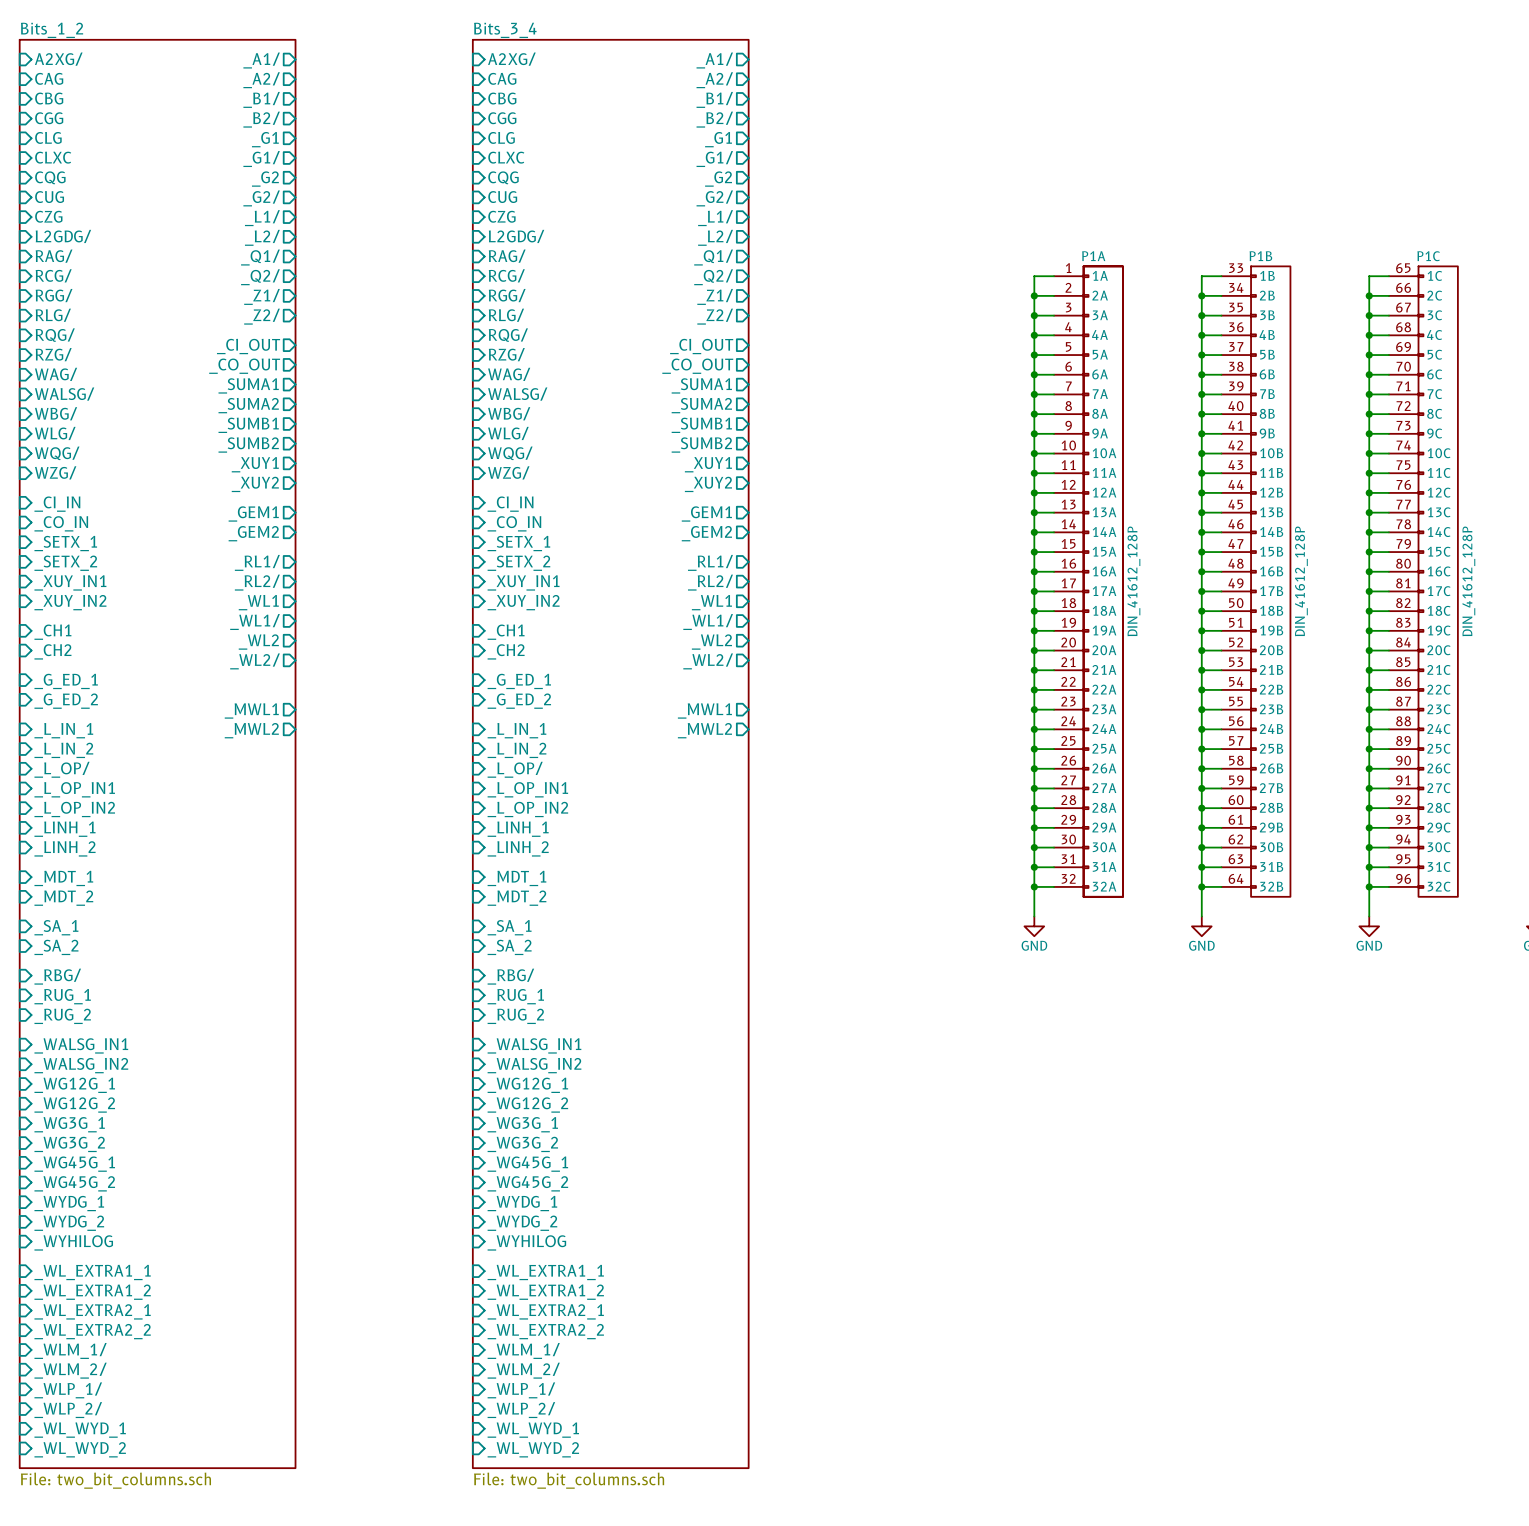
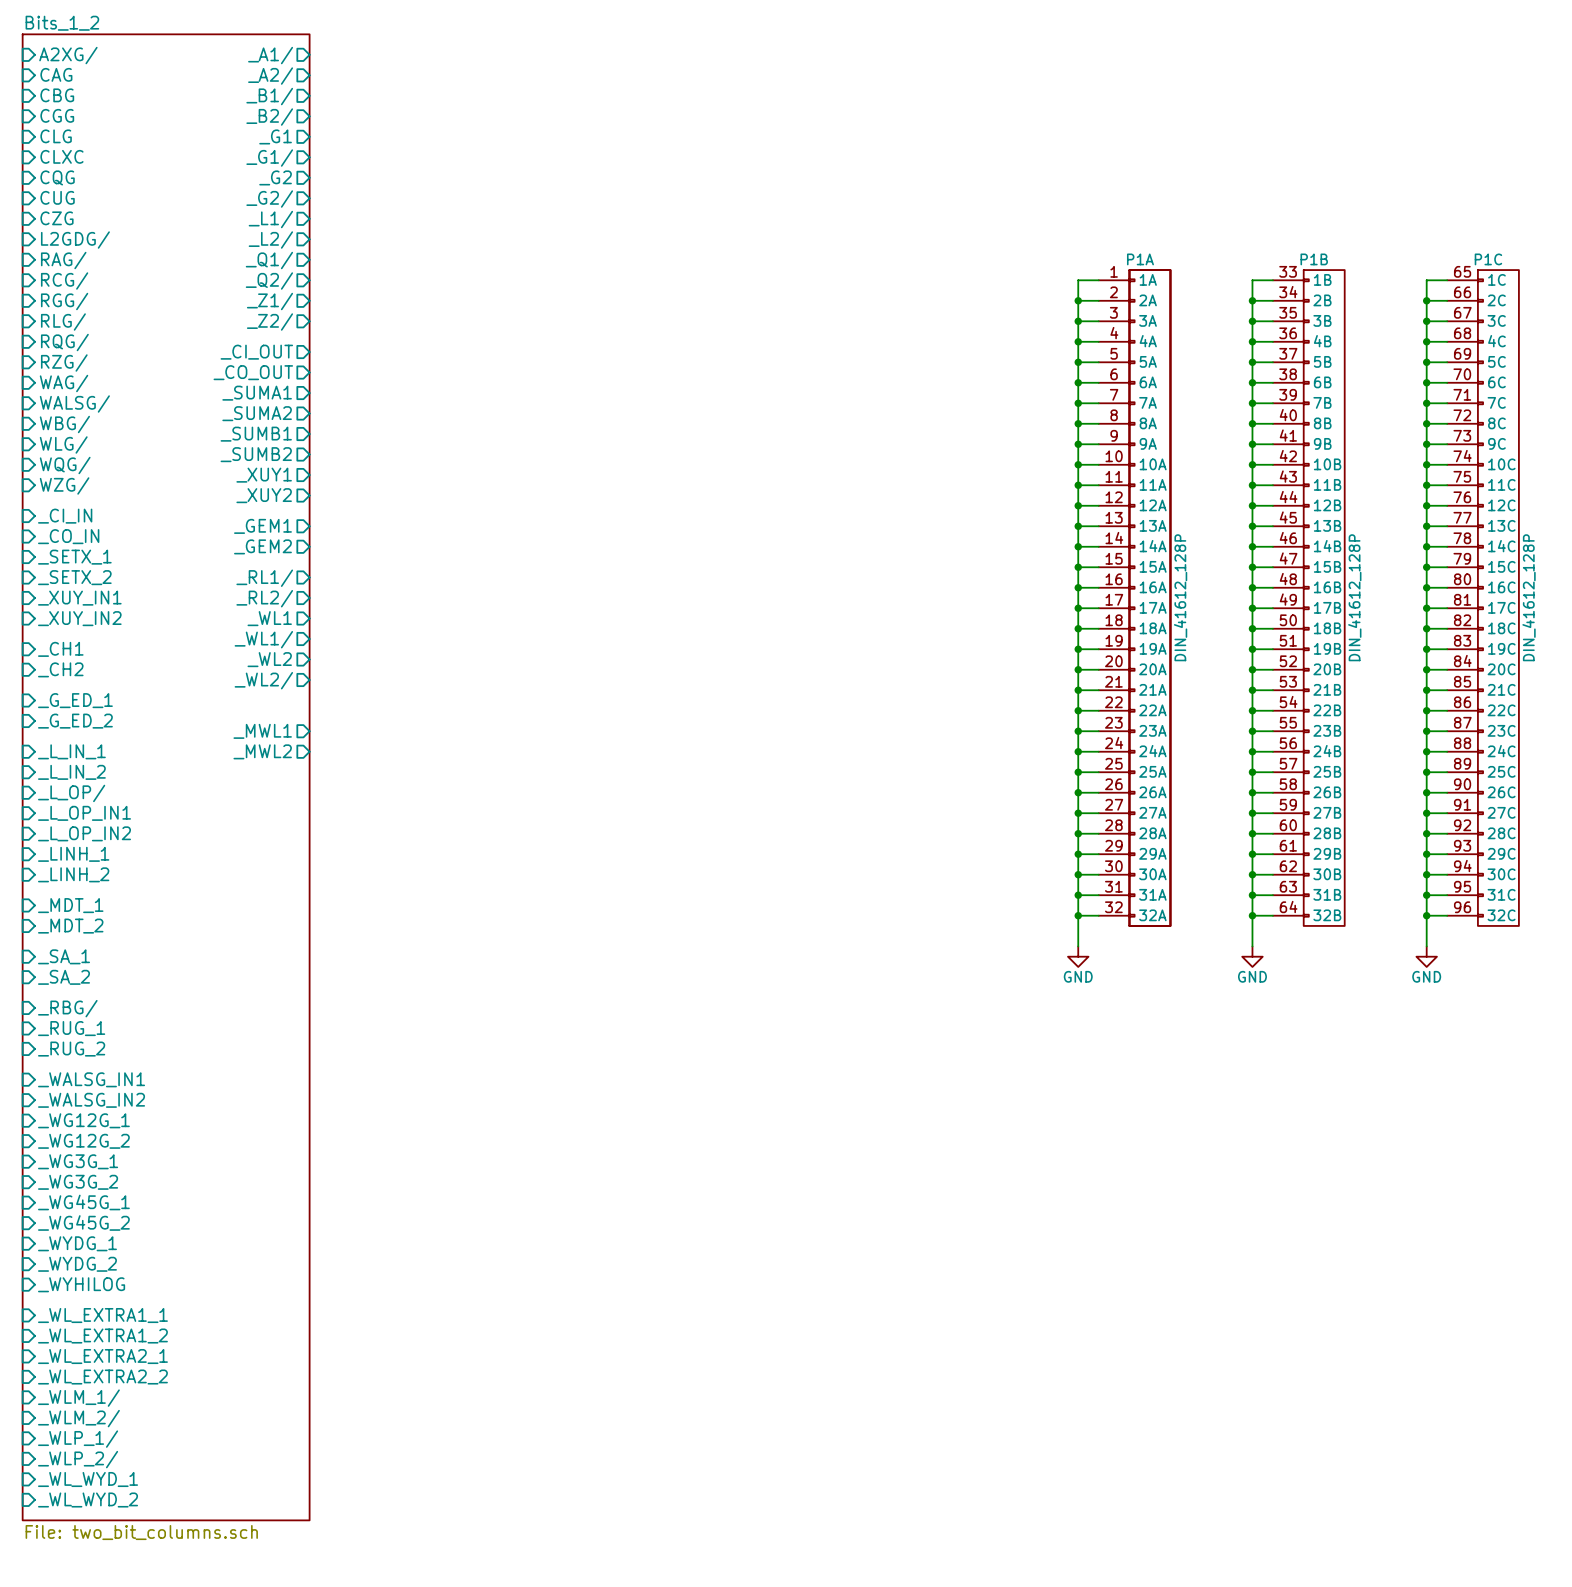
sheet pin: A2XG/ (511, 59) -> none
sheet pin: _A1/ (714, 60) -> none
sheet pin: CAG (502, 78) -> none
sheet pin: _A2/ (714, 80) -> none
sheet pin: CBG (502, 98) -> none
sheet pin: _B1/ (714, 99) -> none
sheet pin: CGG (502, 118) -> none
sheet pin: _B2/ (714, 119) -> none
sheet pin: CLG (501, 137) -> none
sheet pin: _G1 (718, 139) -> none
sheet pin: CLXC (506, 157) -> none
sheet pin: _G1/ (714, 159) -> none
sheet pin: CQG (503, 177) -> none
sheet pin: _G2 (718, 179) -> none
sheet pin: CUG (502, 197) -> none
sheet pin: _G2/ (714, 198) -> none
sheet pin: CZG (501, 216) -> none
sheet pin: _L1/ (715, 218) -> none
sheet pin: L2GDG/ (516, 236) -> none
sheet pin: _L2/ (715, 237) -> none
sheet pin: RAG/ (507, 256) -> none
sheet pin: _Q1/ (713, 257) -> none
sheet pin: RCG/ (506, 275) -> none
sheet pin: _Q2/ (713, 277) -> none
sheet pin: RGG/ (507, 295) -> none
sheet pin: _Z1/ (715, 296) -> none
sheet pin: RLG/ (506, 315) -> none
sheet pin: _Z2/ (715, 316) -> none
sheet pin: RQG/ (508, 335) -> none
sheet pin: _CI_OUT (701, 346) -> none
sheet pin: RZG/ (506, 354) -> none
sheet pin: _CO_OUT (697, 366) -> none
sheet pin: WAG/ (509, 374) -> none
sheet pin: _SUMA1 (701, 385) -> none
sheet pin: WALSG/ (517, 394) -> none
sheet pin: _SUMA2 (701, 405) -> none
sheet pin: WBG/ (509, 413) -> none
sheet pin: _SUMB1 (701, 425) -> none
sheet pin: WLG/ (508, 433) -> none
sheet pin: _SUMB2 (701, 445) -> none
sheet pin: WQG/ (510, 453) -> none
sheet pin: _XUY1 (708, 464) -> none
sheet pin: WZG/ (508, 472) -> none
sheet pin: _XUY2 (708, 484) -> none
sheet pin: _CI_IN (510, 504) -> none
sheet pin: _GEM1 (706, 513) -> none
sheet pin: _CO_IN (514, 523) -> none
sheet pin: _GEM2 (706, 533) -> none
sheet pin: _SETX_1 (518, 543) -> none
sheet pin: _RL1/ (710, 562) -> none
sheet pin: _SETX_2 (518, 563) -> none
sheet pin: _XUY_IN1 (523, 582) -> none
sheet pin: _RL2/ (710, 582) -> none
sheet pin: _XUY_IN2 (523, 602) -> none
sheet pin: _WL1 (711, 602) -> none
sheet pin: _WL1/ (708, 622) -> none
sheet pin: _CH1 (506, 632) -> none
sheet pin: _WL2 (711, 642) -> none
sheet pin: _CH2 (506, 651) -> none
sheet pin: _WL2/ (708, 661) -> none
sheet pin: _G_ED_1 (519, 681) -> none
sheet pin: _G_ED_2 (519, 701) -> none
sheet pin: _MWL1 (704, 710) -> none
sheet pin: _L_IN_1 (516, 730) -> none
sheet pin: _MWL2 (704, 730) -> none
sheet pin: _L_IN_2 (516, 750) -> none
sheet Bits_3_4: File: two_bit_columns.sch (610, 753) -> none
sheet pin: _L_OP/ (515, 769) -> none
sheet pin: _L_OP_IN1 (527, 789) -> none
sheet pin: _L_OP_IN2 (527, 809) -> none
sheet pin: _LINH_1 (518, 829) -> none
sheet pin: _LINH_2 (518, 848) -> none
sheet pin: _MDT_1 (516, 878) -> none
sheet pin: _MDT_2 (516, 898) -> none
sheet pin: _SA_1 (509, 927) -> none
sheet pin: _SA_2 (509, 947) -> none
sheet pin: _RBG/ (510, 976) -> none
sheet pin: _RUG_1 (515, 996) -> none
sheet pin: _RUG_2 (515, 1016) -> none
sheet pin: _WALSG_IN1 (534, 1045) -> none
sheet pin: _WALSG_IN2 (534, 1065) -> none
sheet pin: _WG12G_1 (527, 1085) -> none
sheet pin: _WG12G_2 (527, 1105) -> none
sheet pin: _WG3G_1 (522, 1124) -> none
sheet pin: _WG3G_2 (522, 1144) -> none
sheet pin: _WG45G_1 (527, 1164) -> none
sheet pin: _WG45G_2 (527, 1183) -> none
sheet pin: _WYDG_1 (522, 1203) -> none
sheet pin: _WYDG_2 (522, 1223) -> none
sheet pin: _WYHILOG (526, 1242) -> none
sheet pin: _WL_EXTRA1_1 (545, 1272) -> none
sheet pin: _WL_EXTRA1_2 (545, 1292) -> none
sheet pin: _WL_EXTRA2_1 (545, 1311) -> none
sheet pin: _WL_EXTRA2_2 (545, 1331) -> none
sheet pin: _WLM_1/ (523, 1350) -> none
sheet pin: _WLM_2/ (523, 1370) -> none
sheet pin: _WLP_1/ (521, 1390) -> none
sheet pin: _WLP_2/ (521, 1410) -> none
sheet pin: _WL_WYD_1 (533, 1430) -> none
sheet pin: _WL_WYD_2 (533, 1449) -> none

